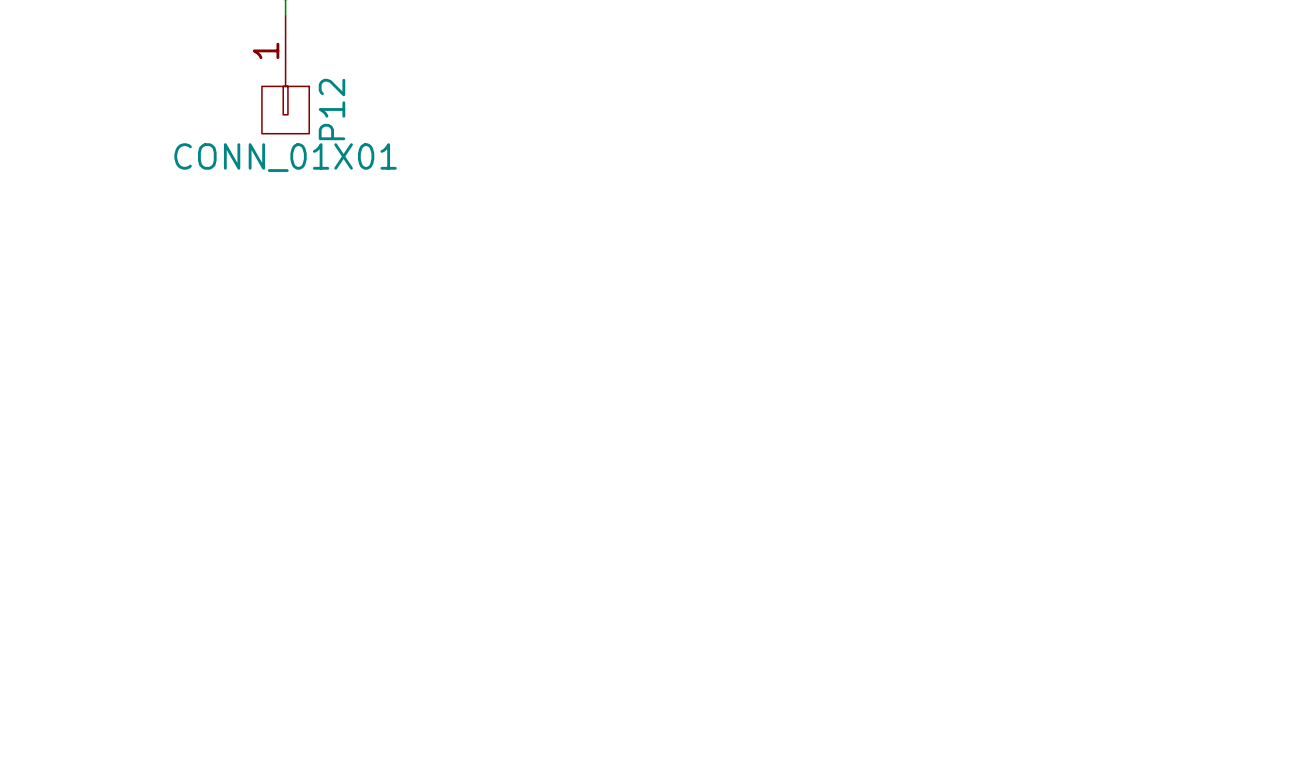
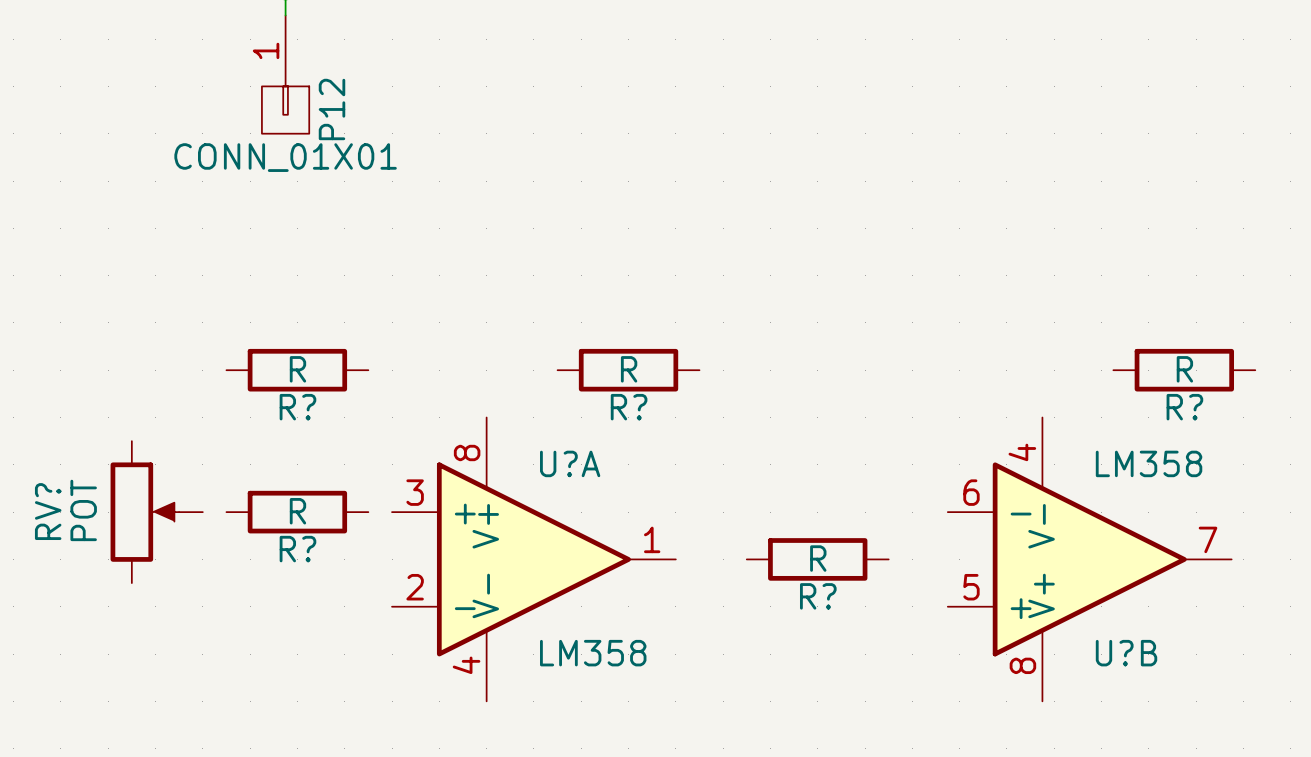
R?: none -> R (297, 370)
R?: none -> R (628, 370)
R?: none -> R (1184, 370)
RV?: none -> POT (156, 512)
R?: none -> R (297, 512)
U?A: none -> LM358 (533, 559)
R?: none -> R (817, 559)
U?B: none -> LM358 (1089, 559)

